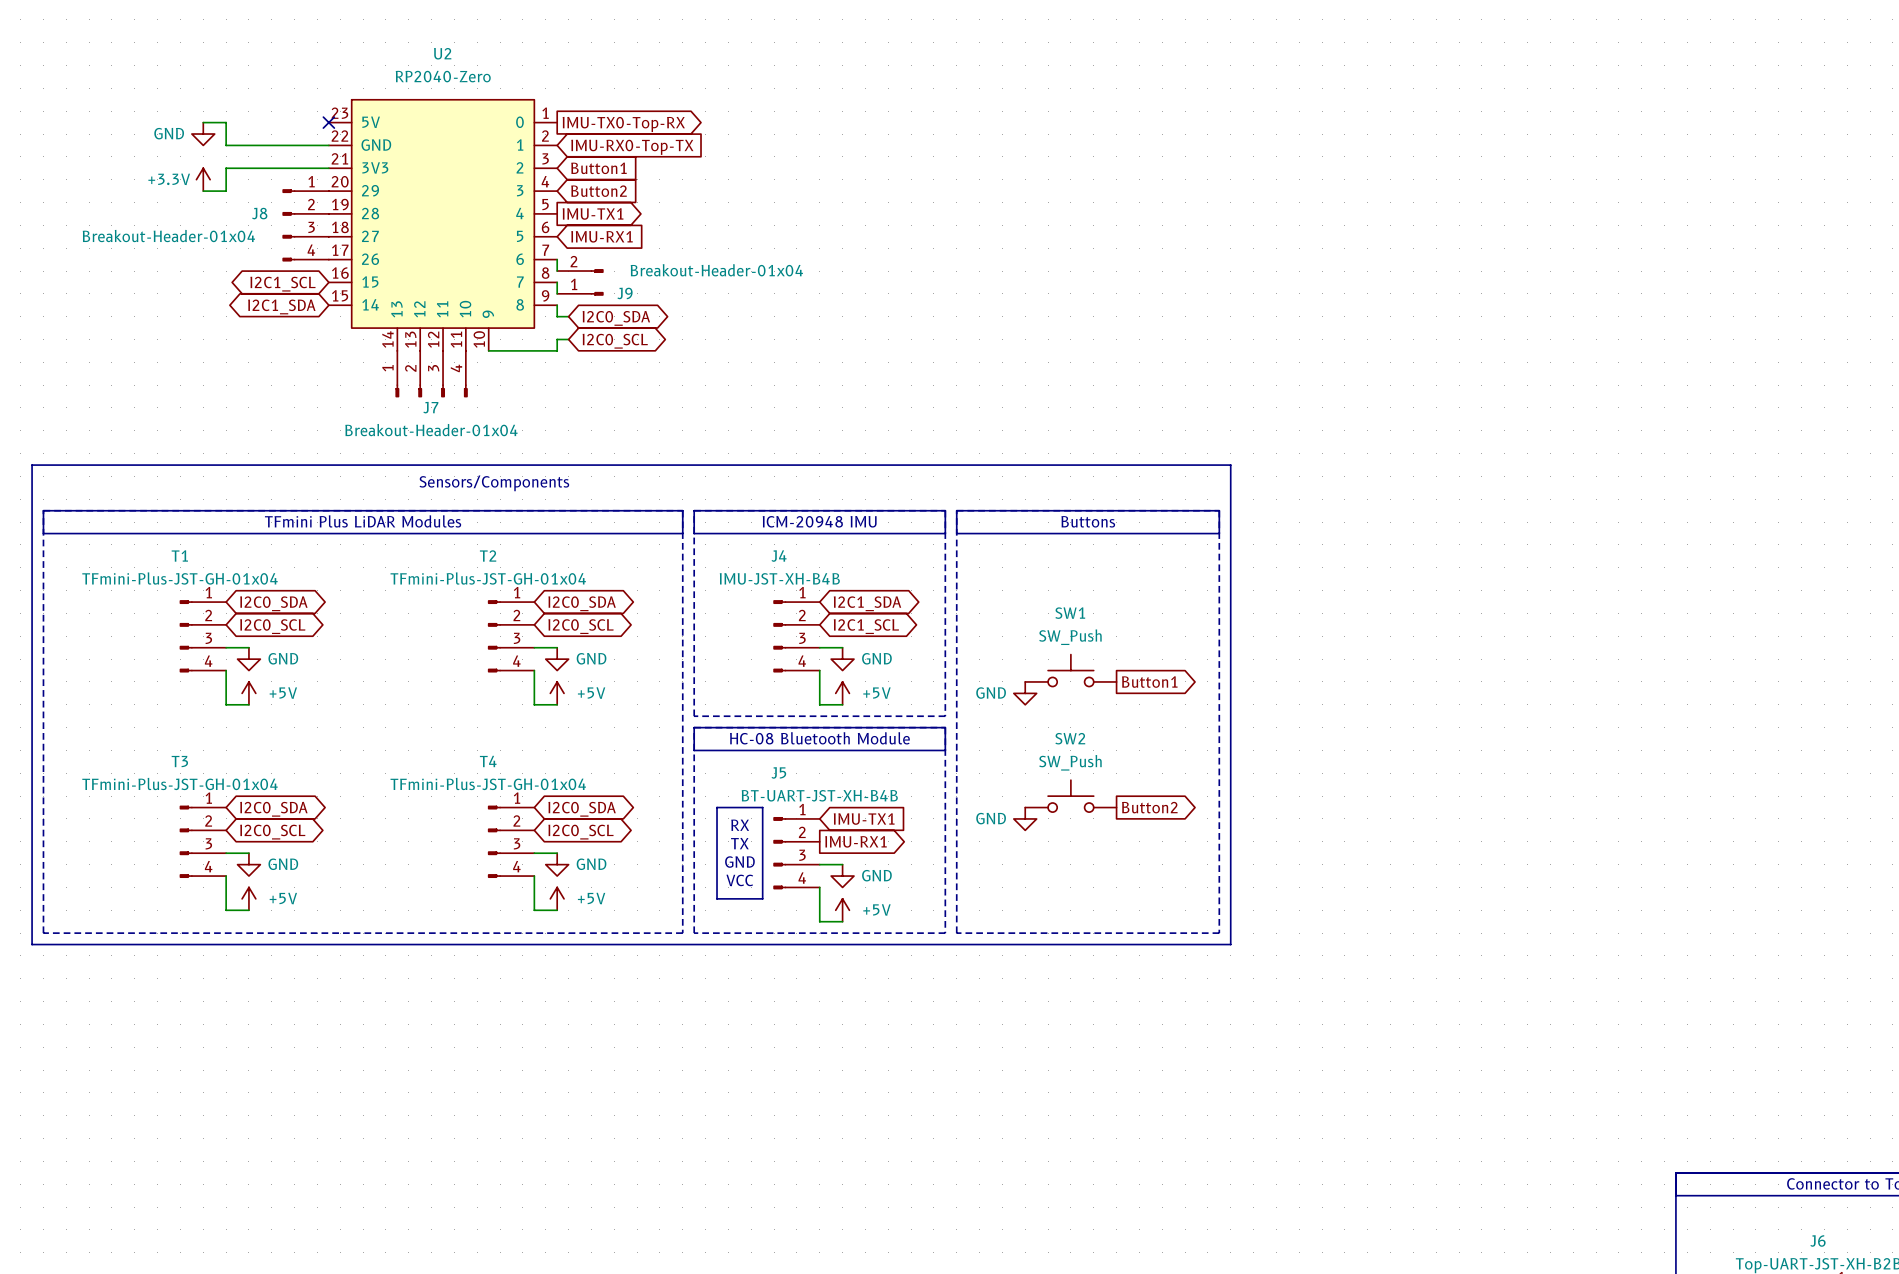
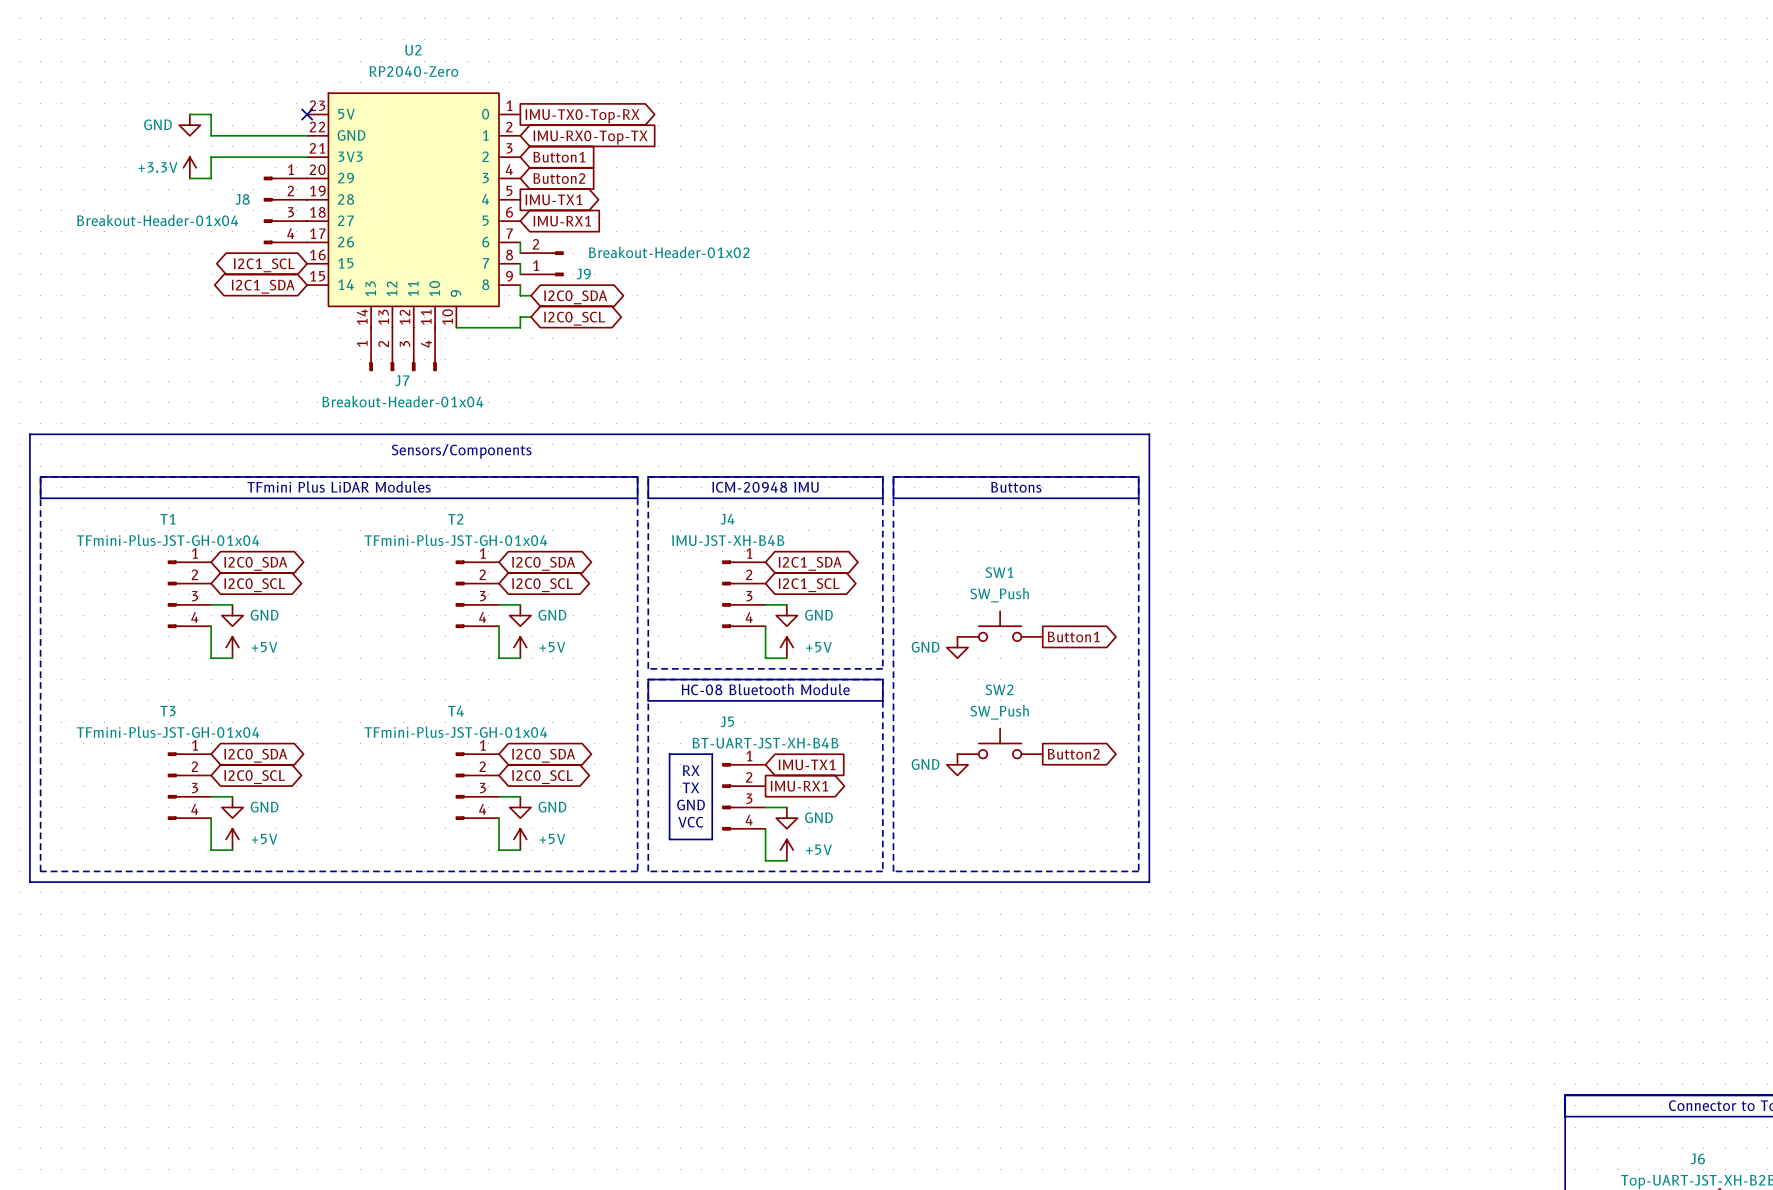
J9 value: Breakout-Header-01x04 (716, 270) -> Breakout-Header-01x02 (669, 252)

